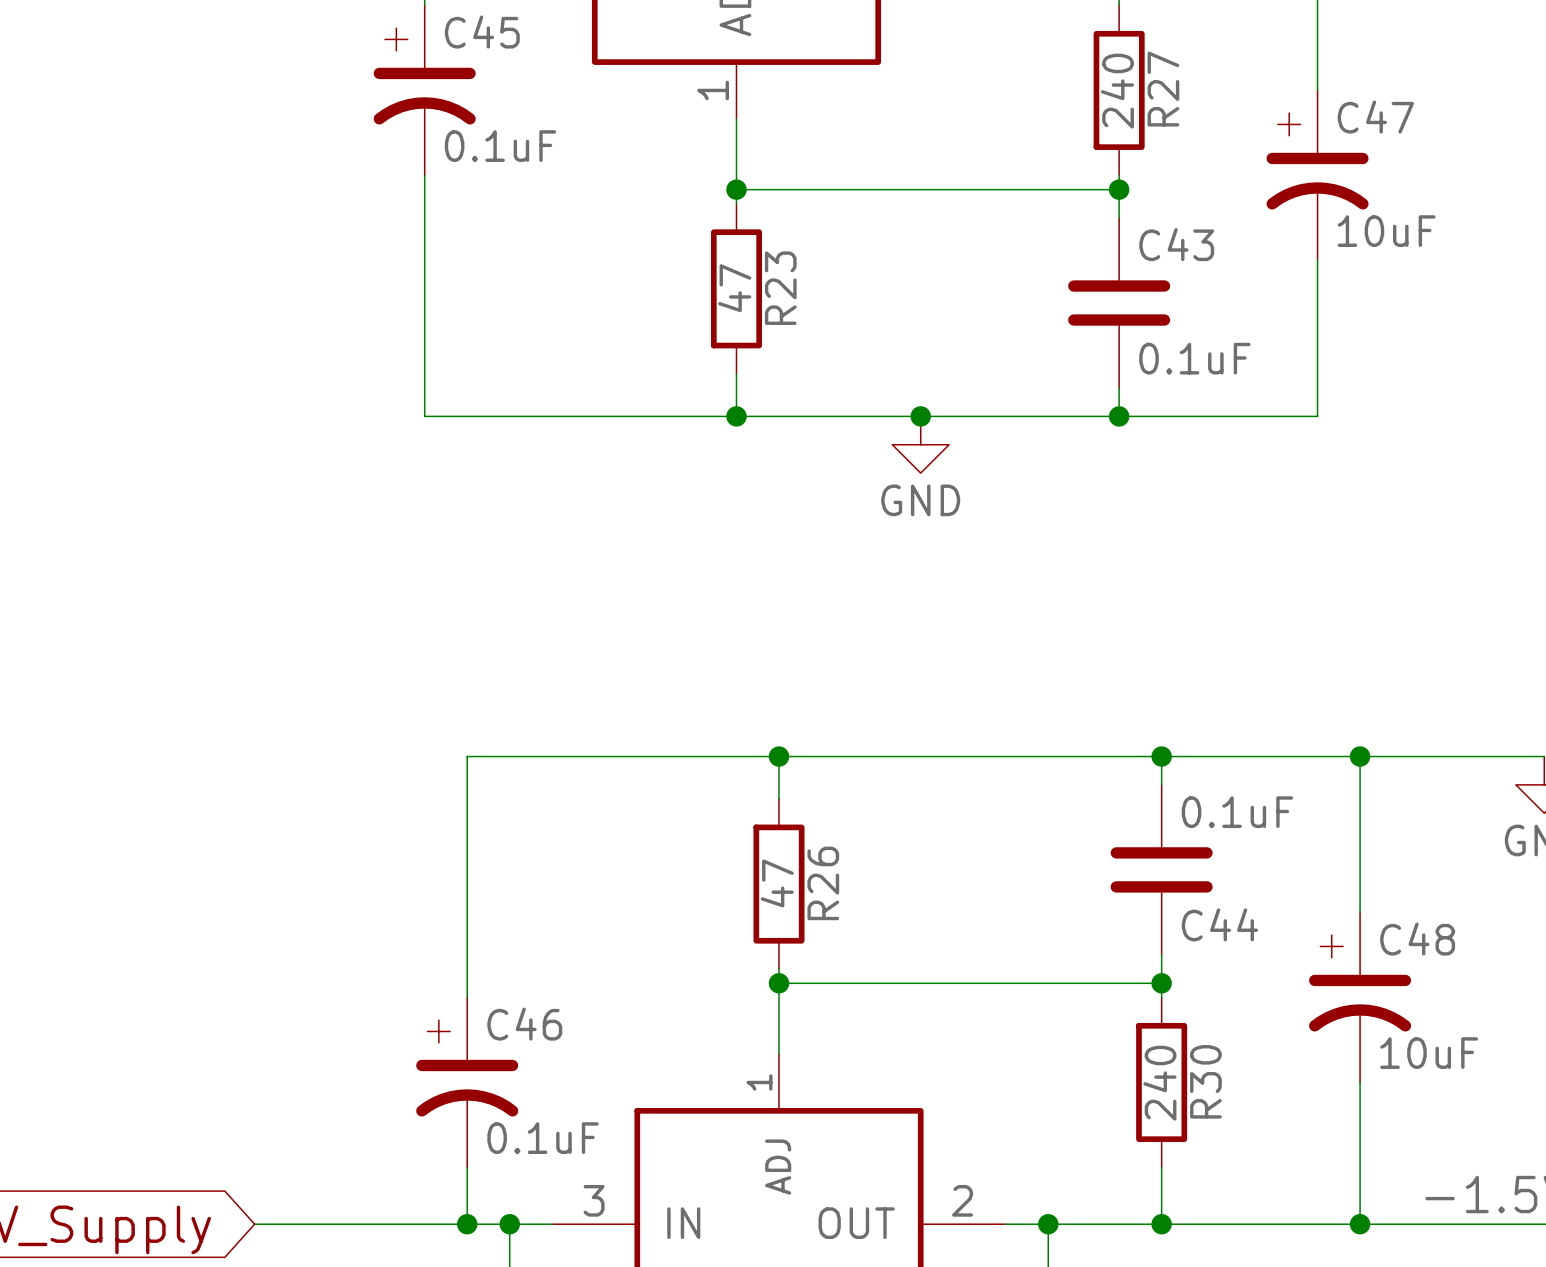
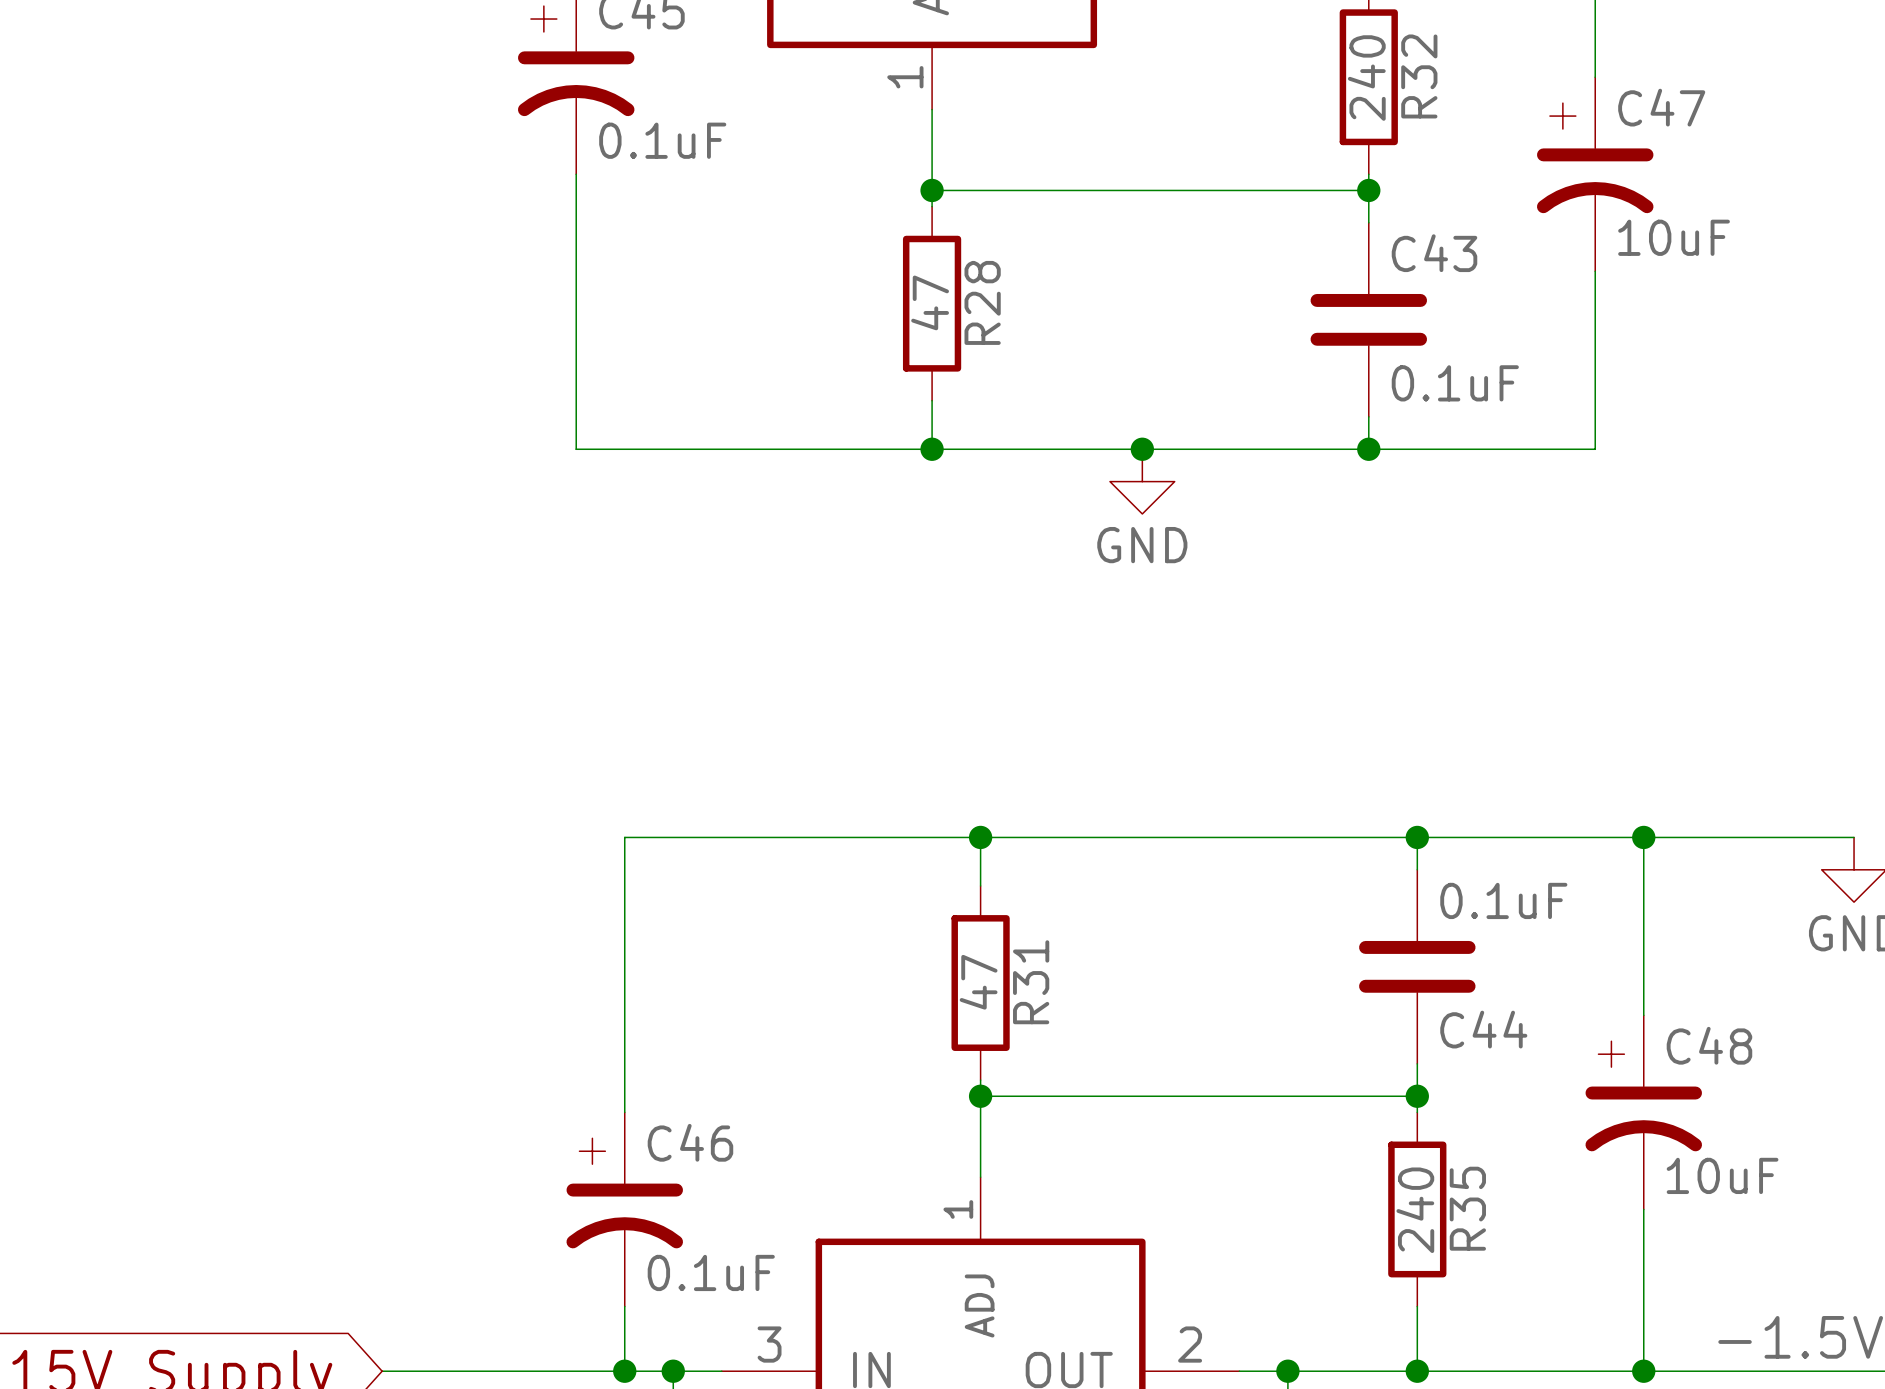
R27 name: R27 (1163, 89) -> R32 (1419, 76)
R23 name: R23 (780, 288) -> R28 (982, 302)
R26 name: R26 (823, 883) -> R31 (1031, 982)
R30 name: R30 (1205, 1081) -> R35 (1467, 1208)

